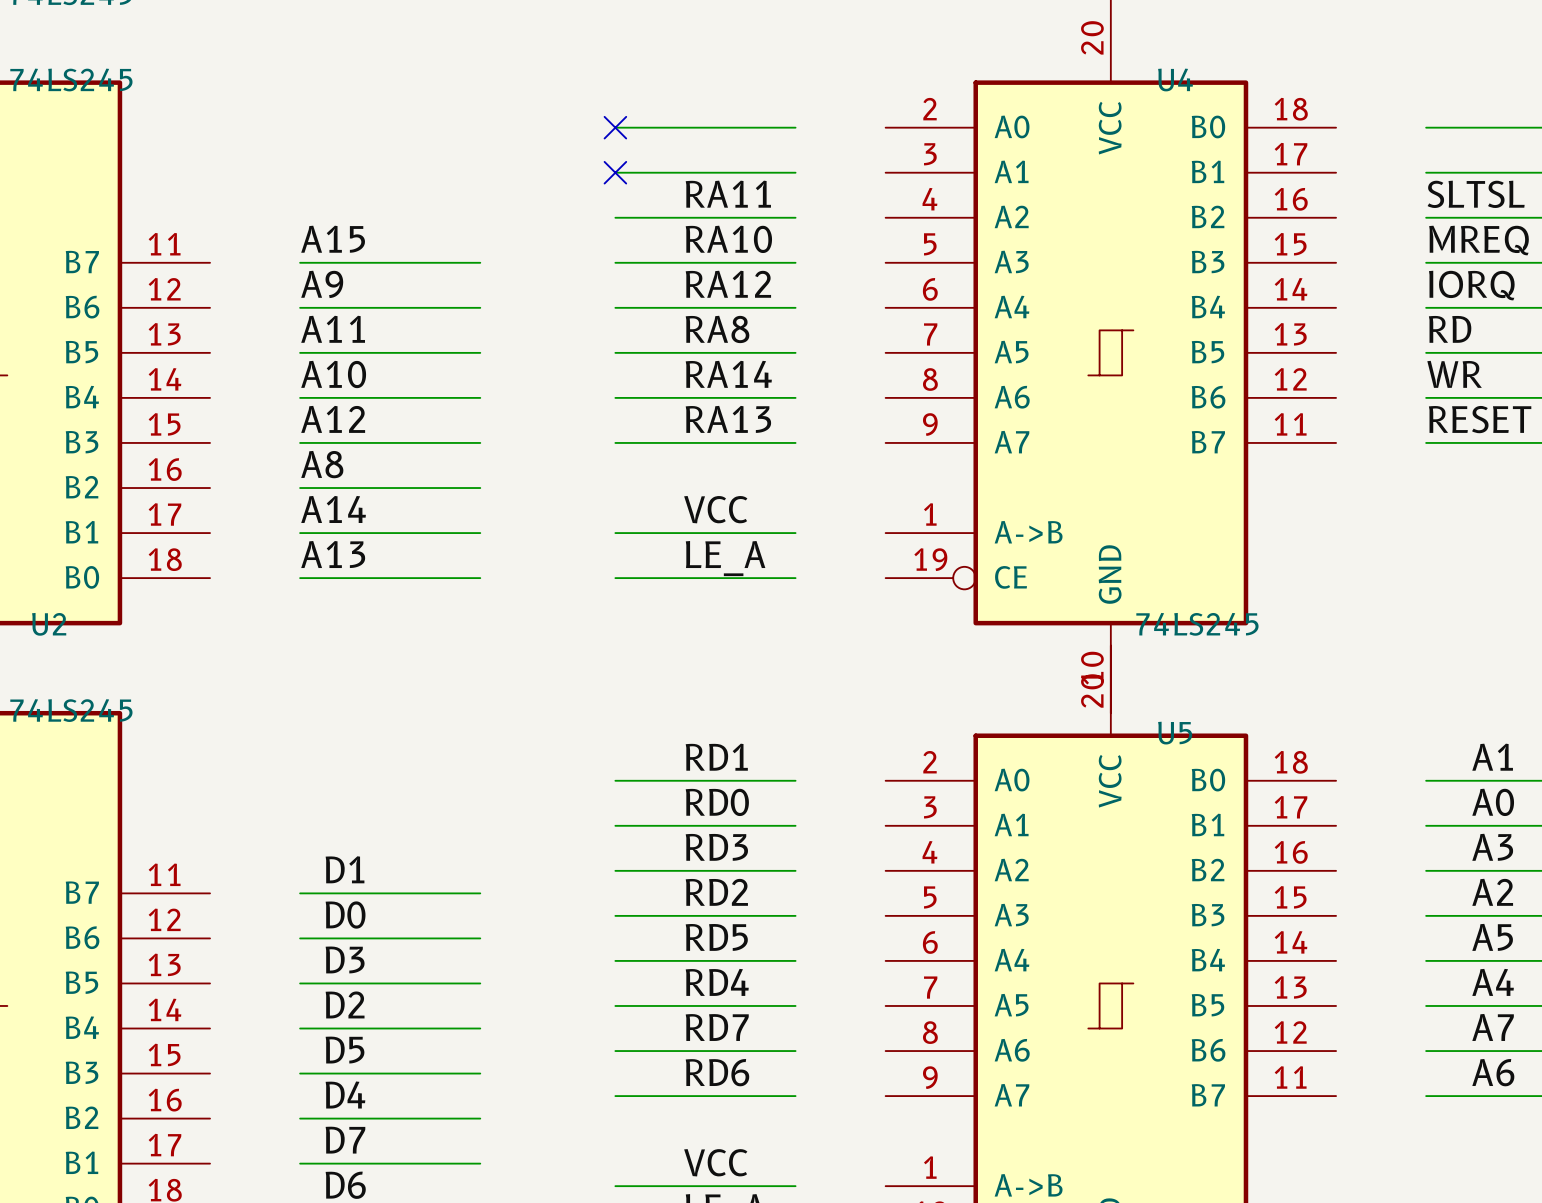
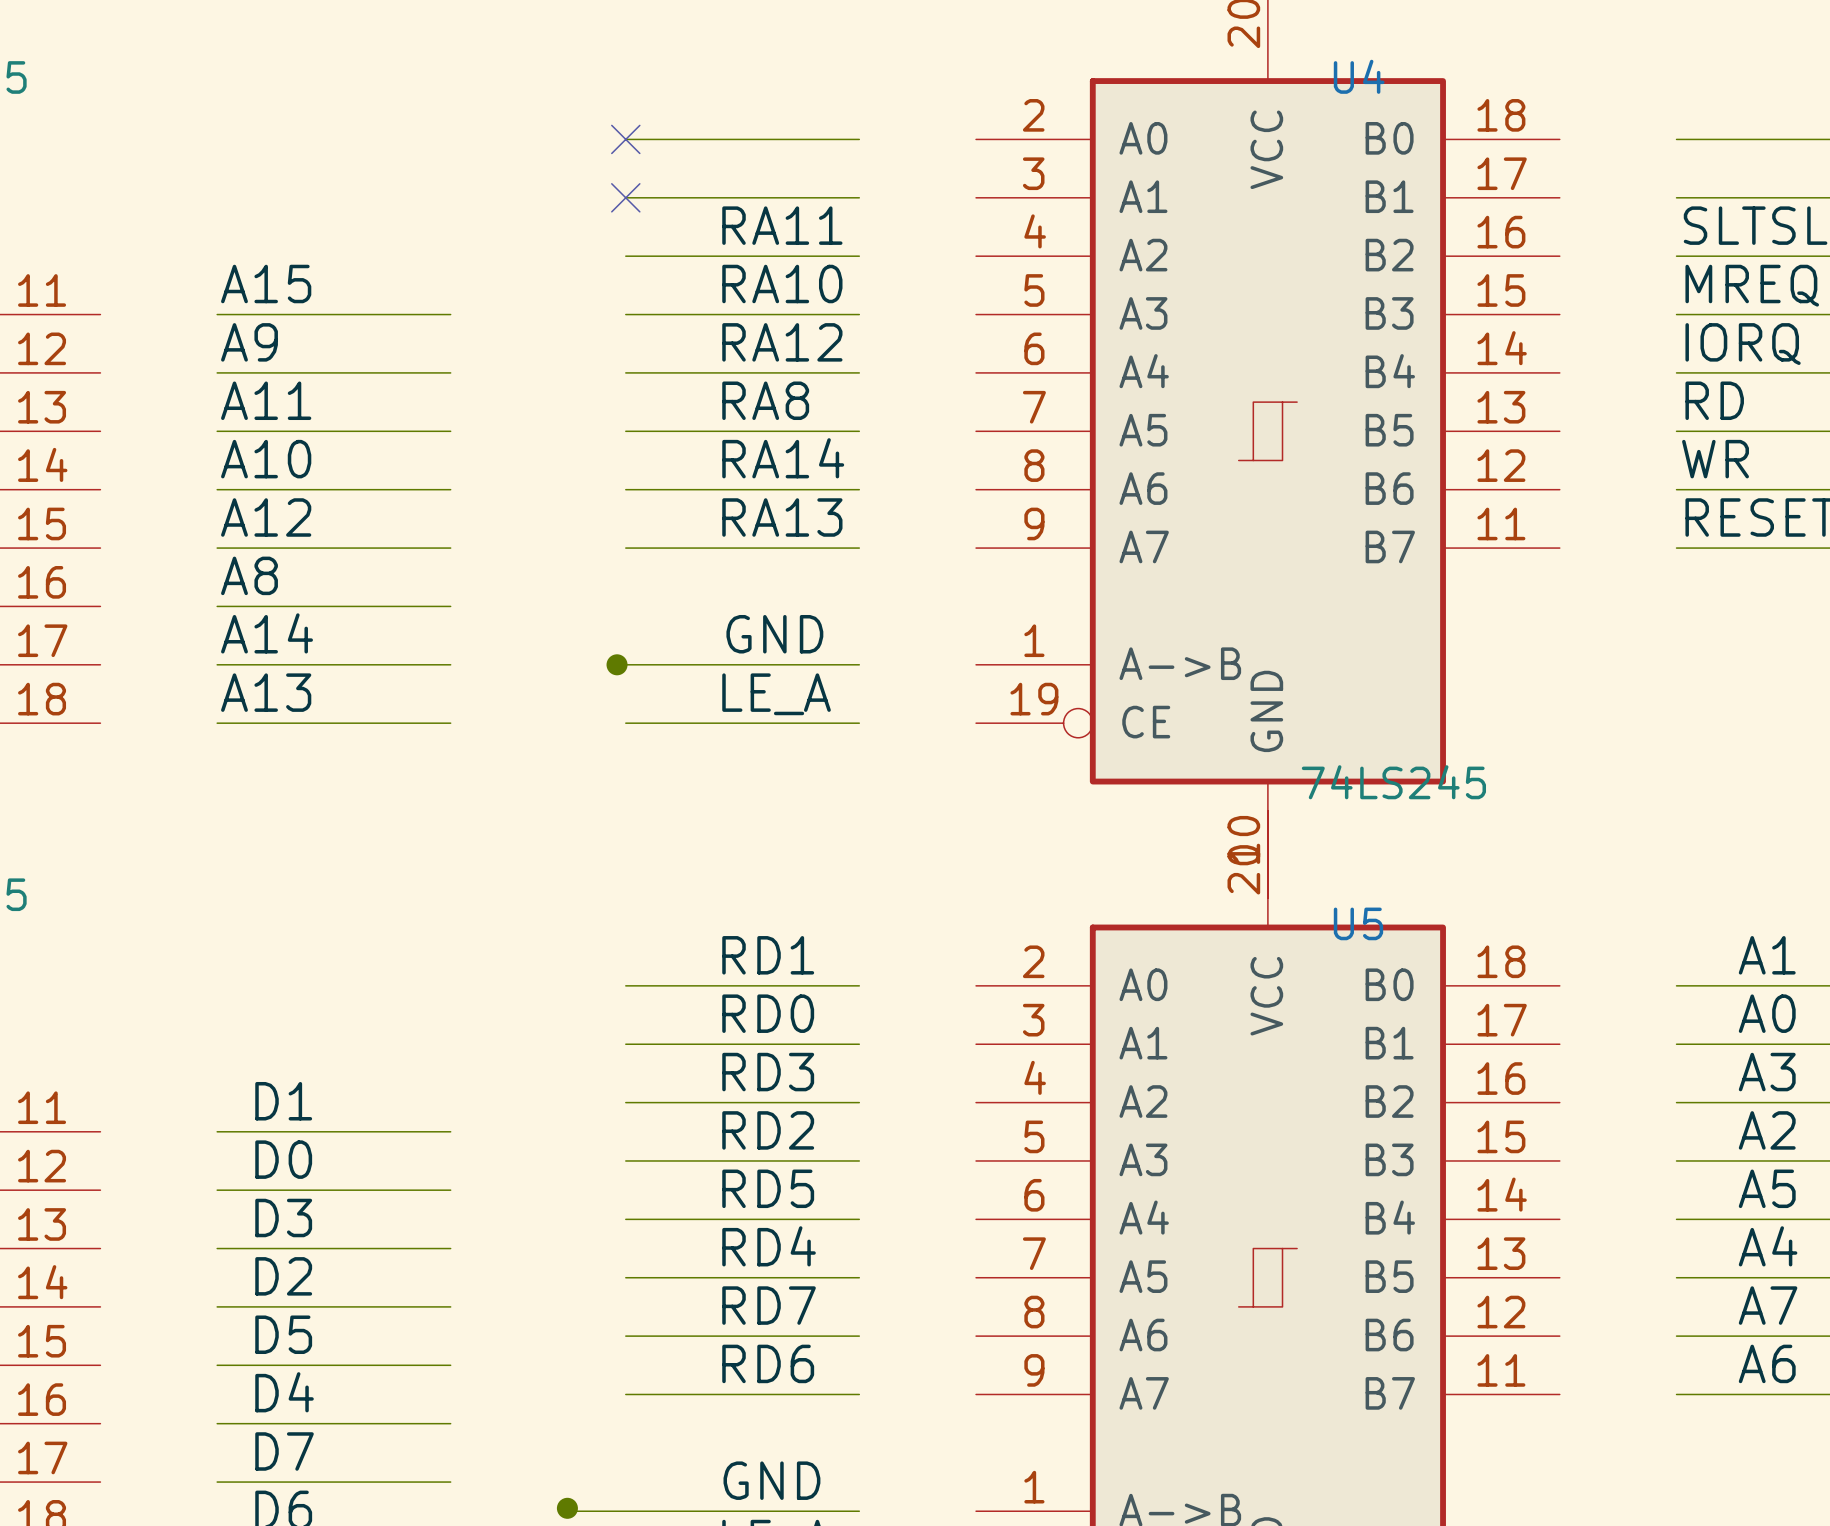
label: VCC (715, 509) -> GND (774, 634)
junction: none -> (617, 664)
label: VCC (715, 1162) -> GND (771, 1480)
junction: none -> (567, 1508)
wire: none -> (567, 1511) (625, 1511)

